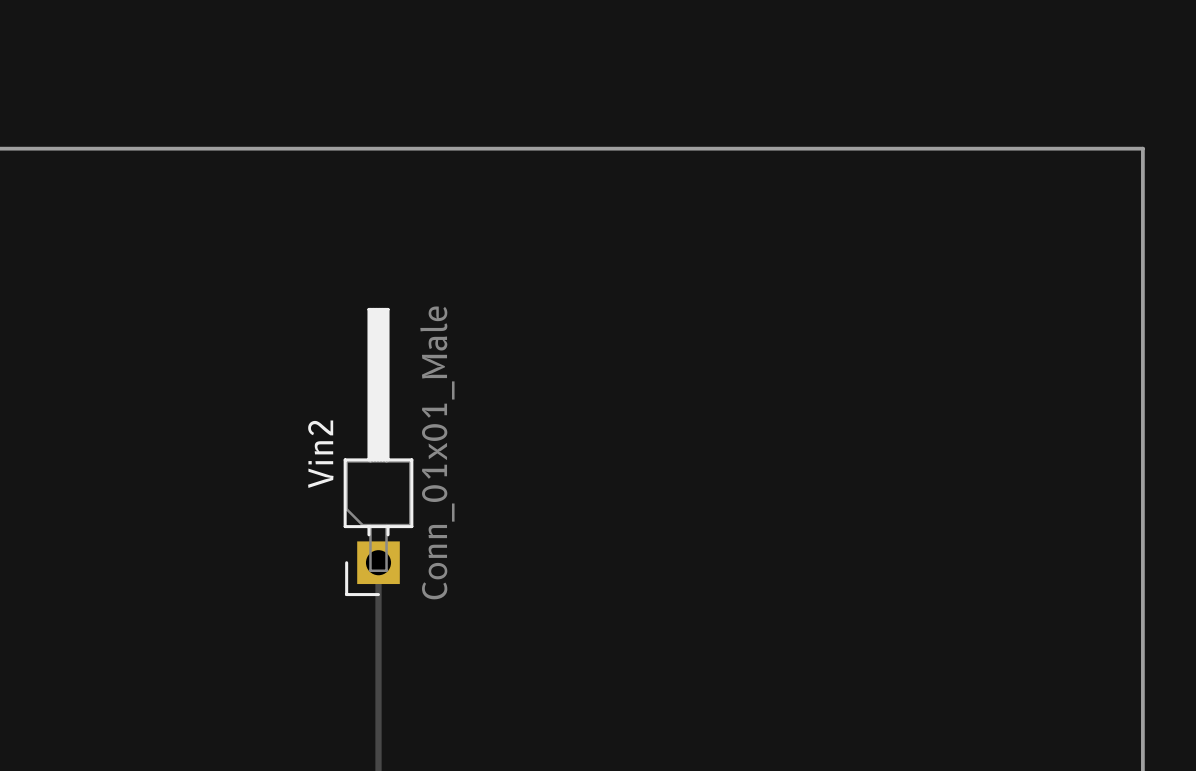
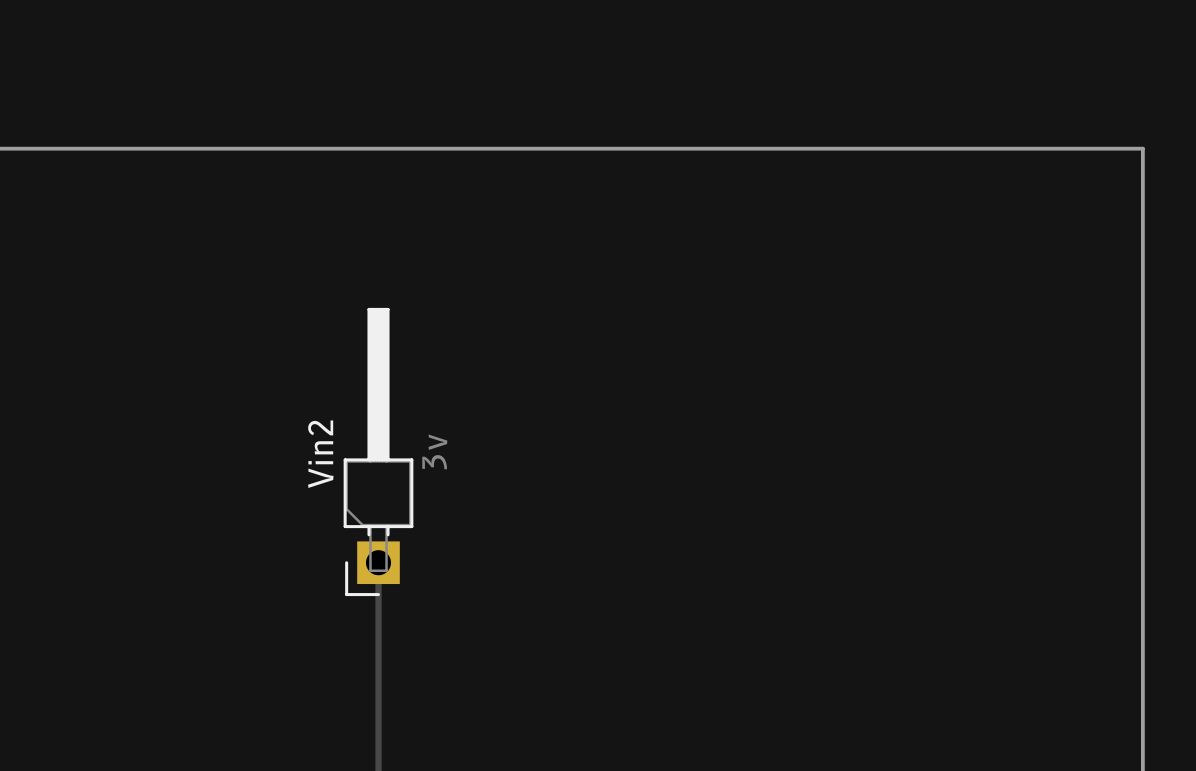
Vin2 value: Conn_01x01_Male (437, 452) -> 3v (434, 451)

